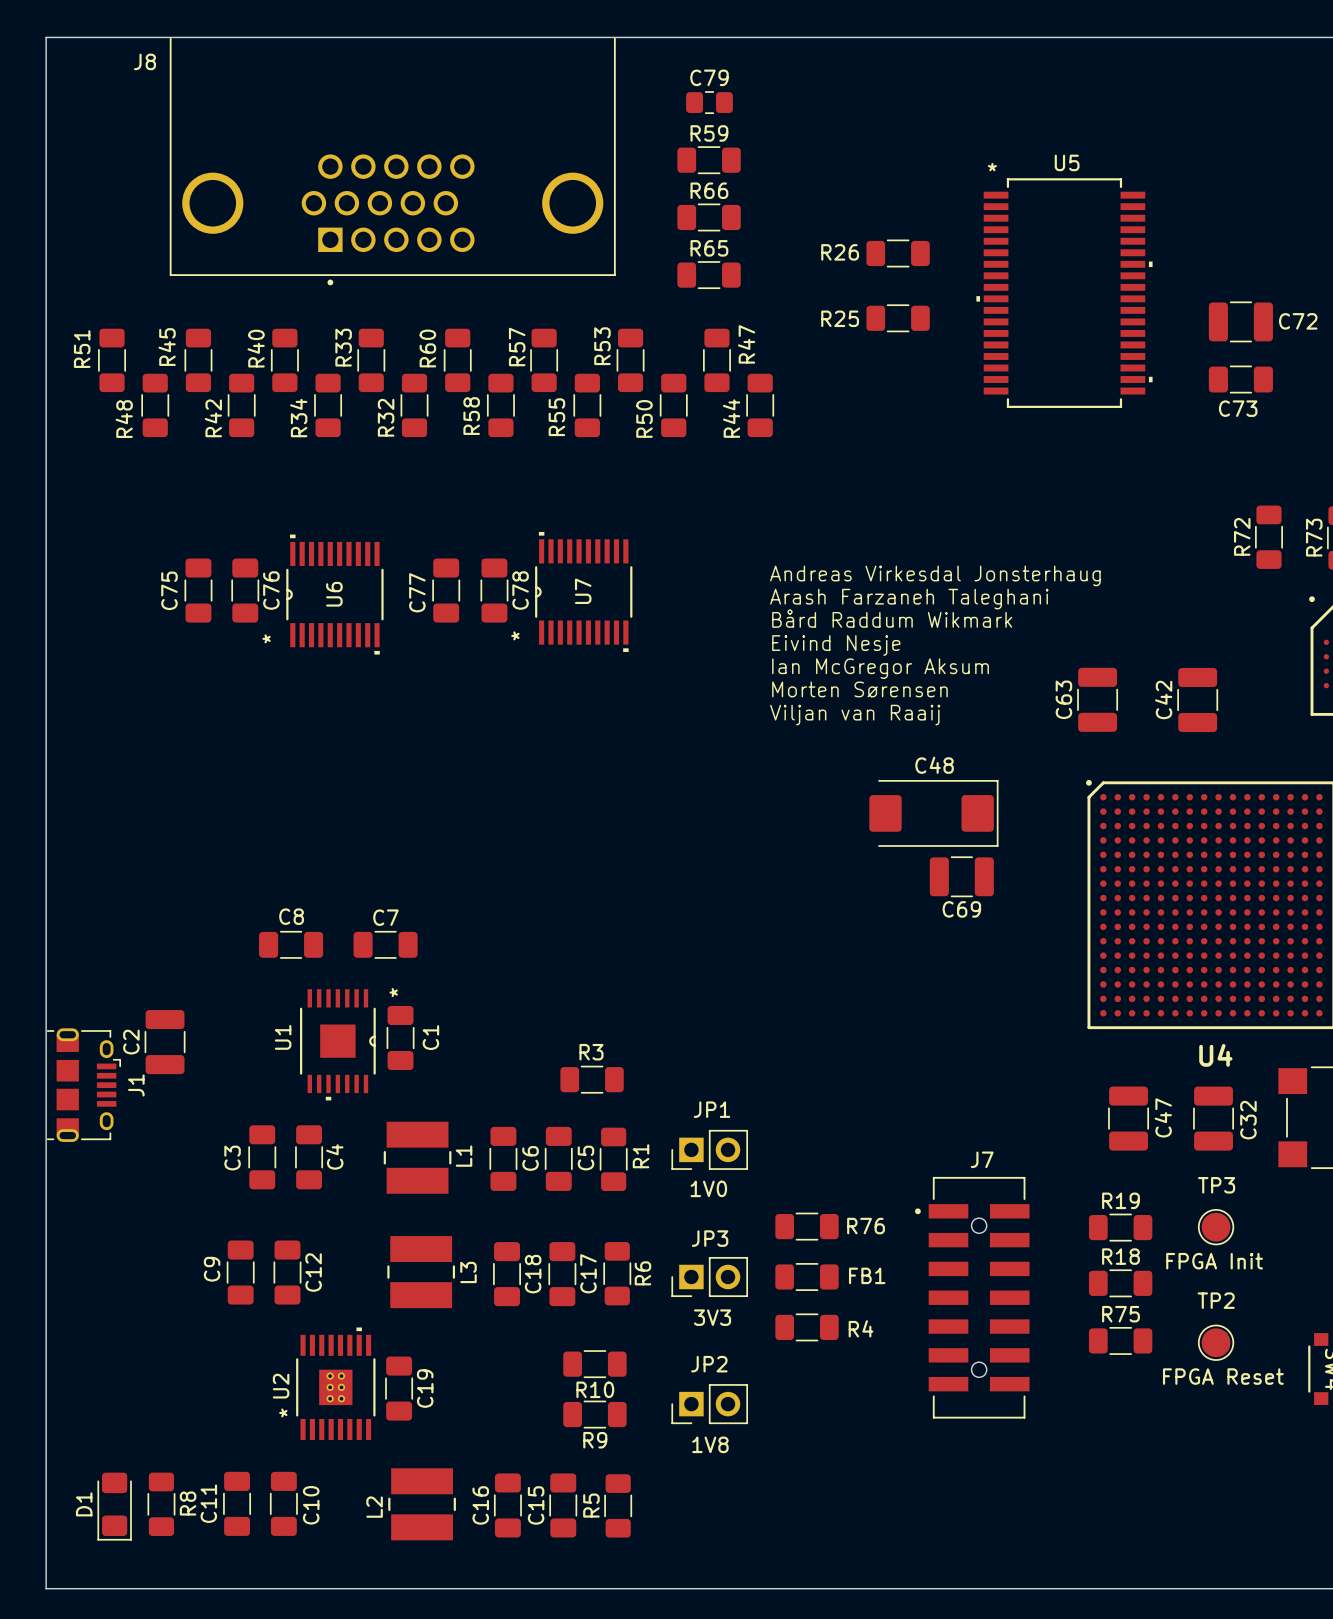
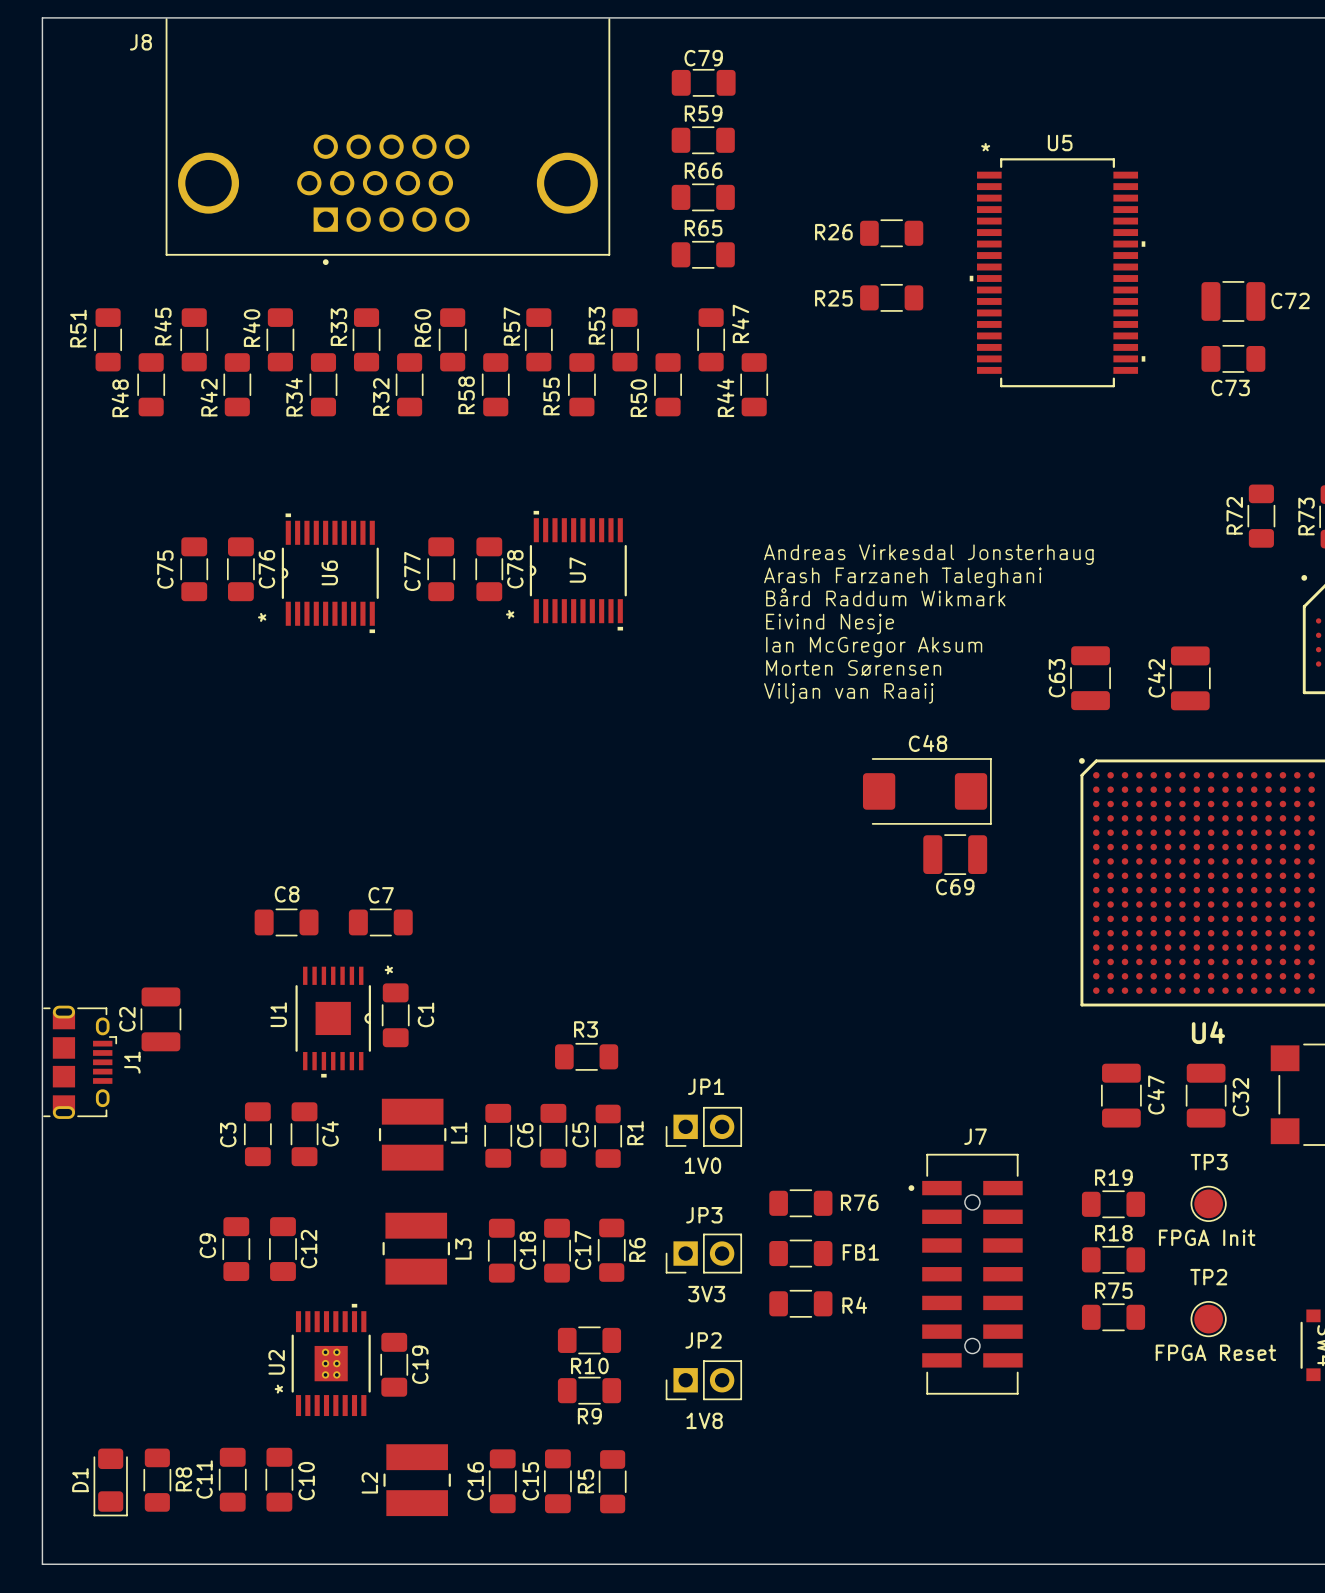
C79 footprint: [686, 91, 733, 115] -> [671, 68, 736, 97]

